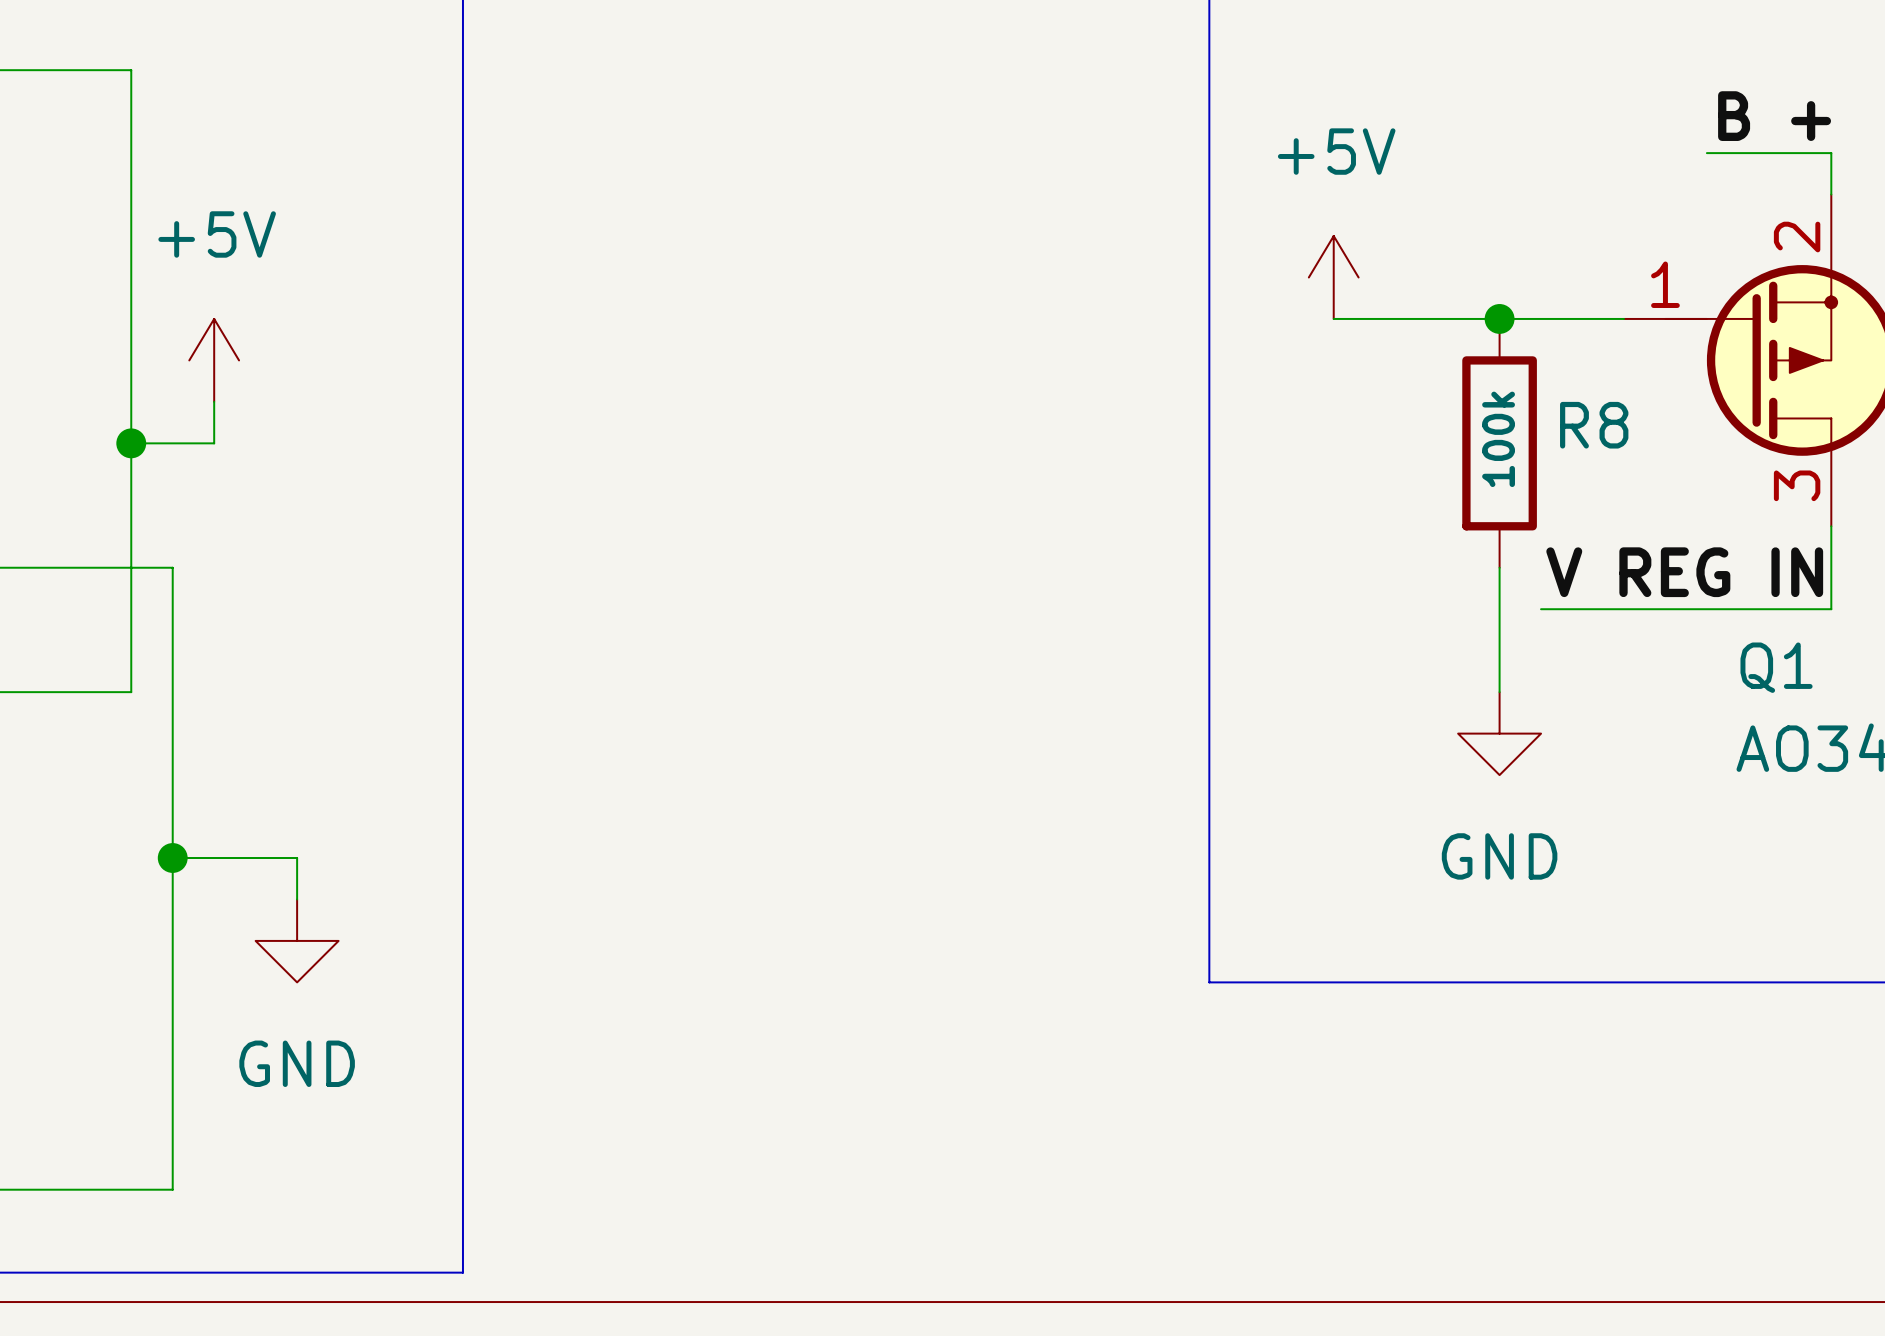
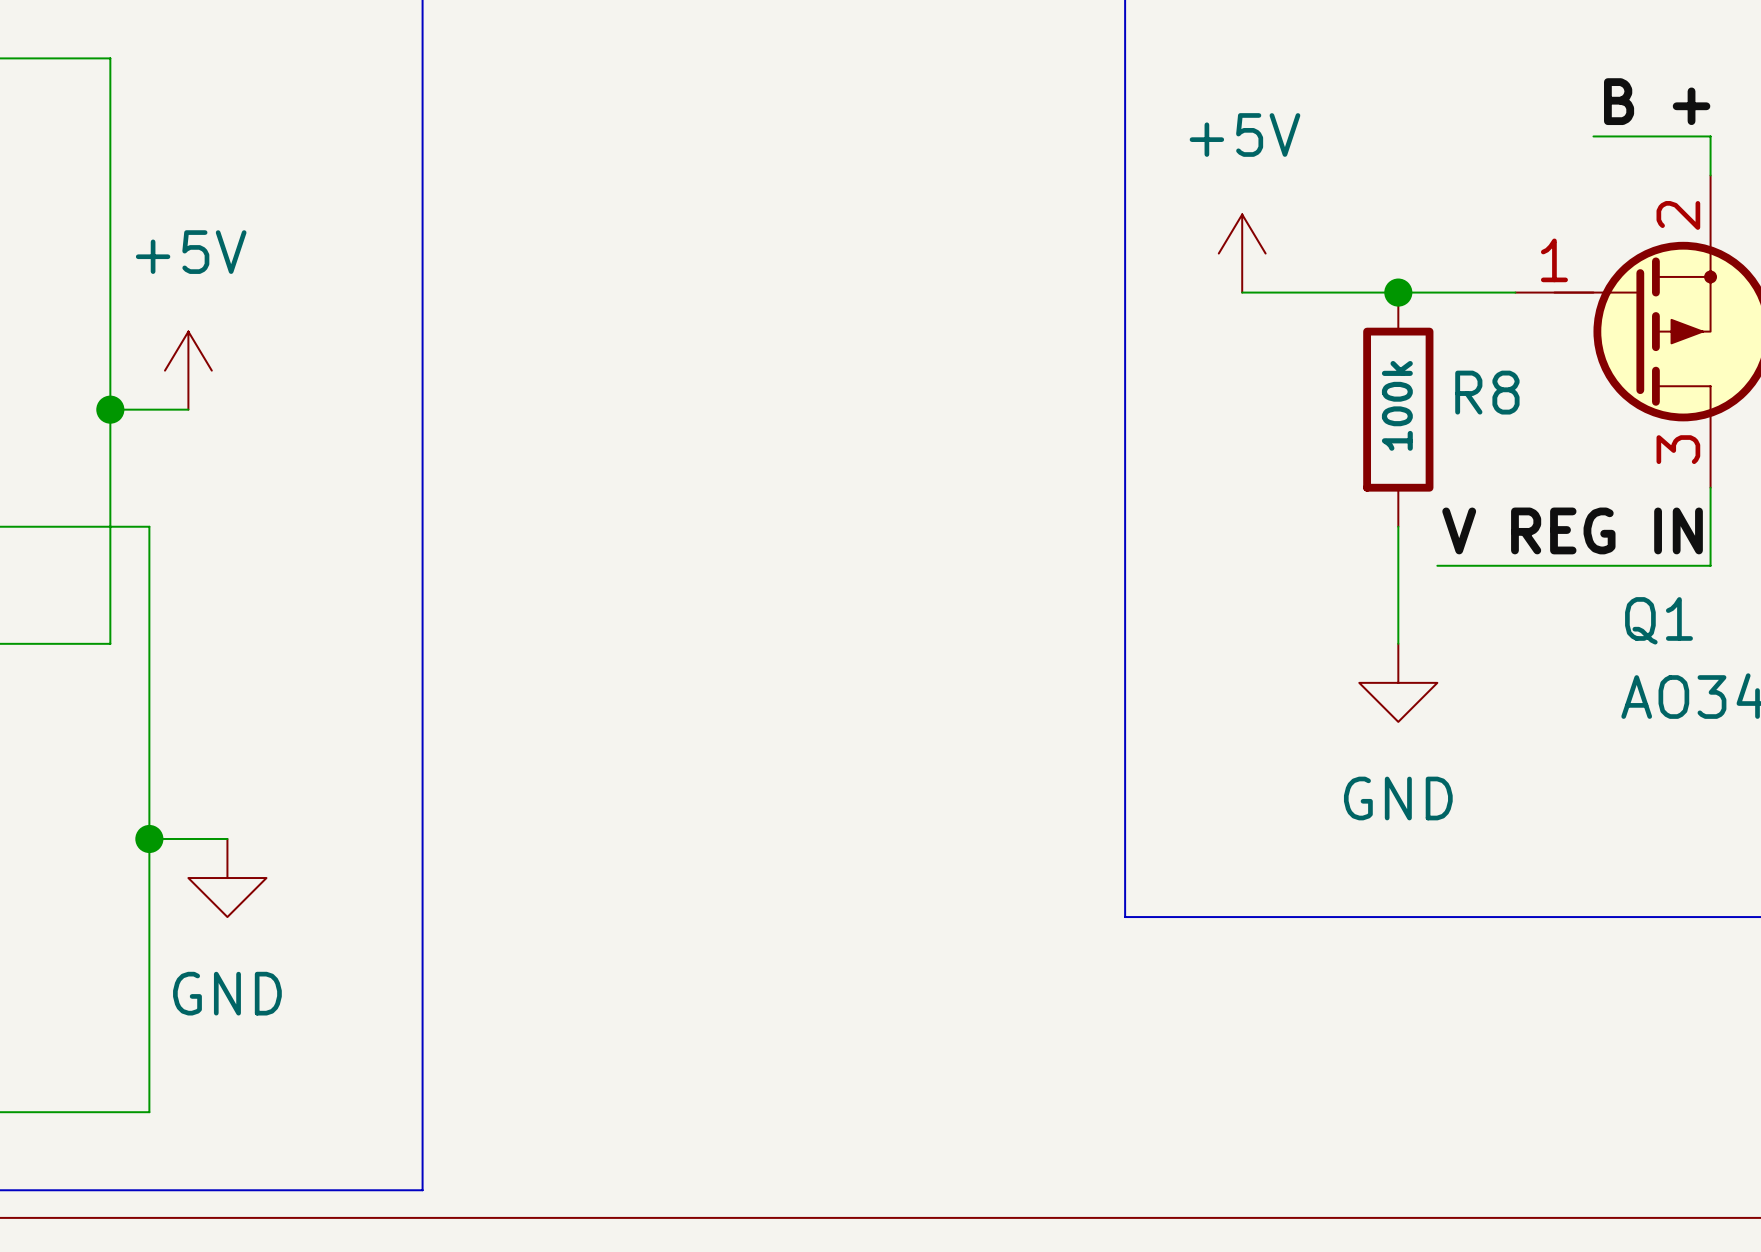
power symbol position: +5V (214, 360) -> +5V (188, 370)
wire: (172, 858) (297, 858) (297, 899) -> none
junction position: (172, 858) -> (149, 838)
wire: none -> (149, 838) (227, 838)
power symbol position: GND (297, 940) -> GND (227, 878)

